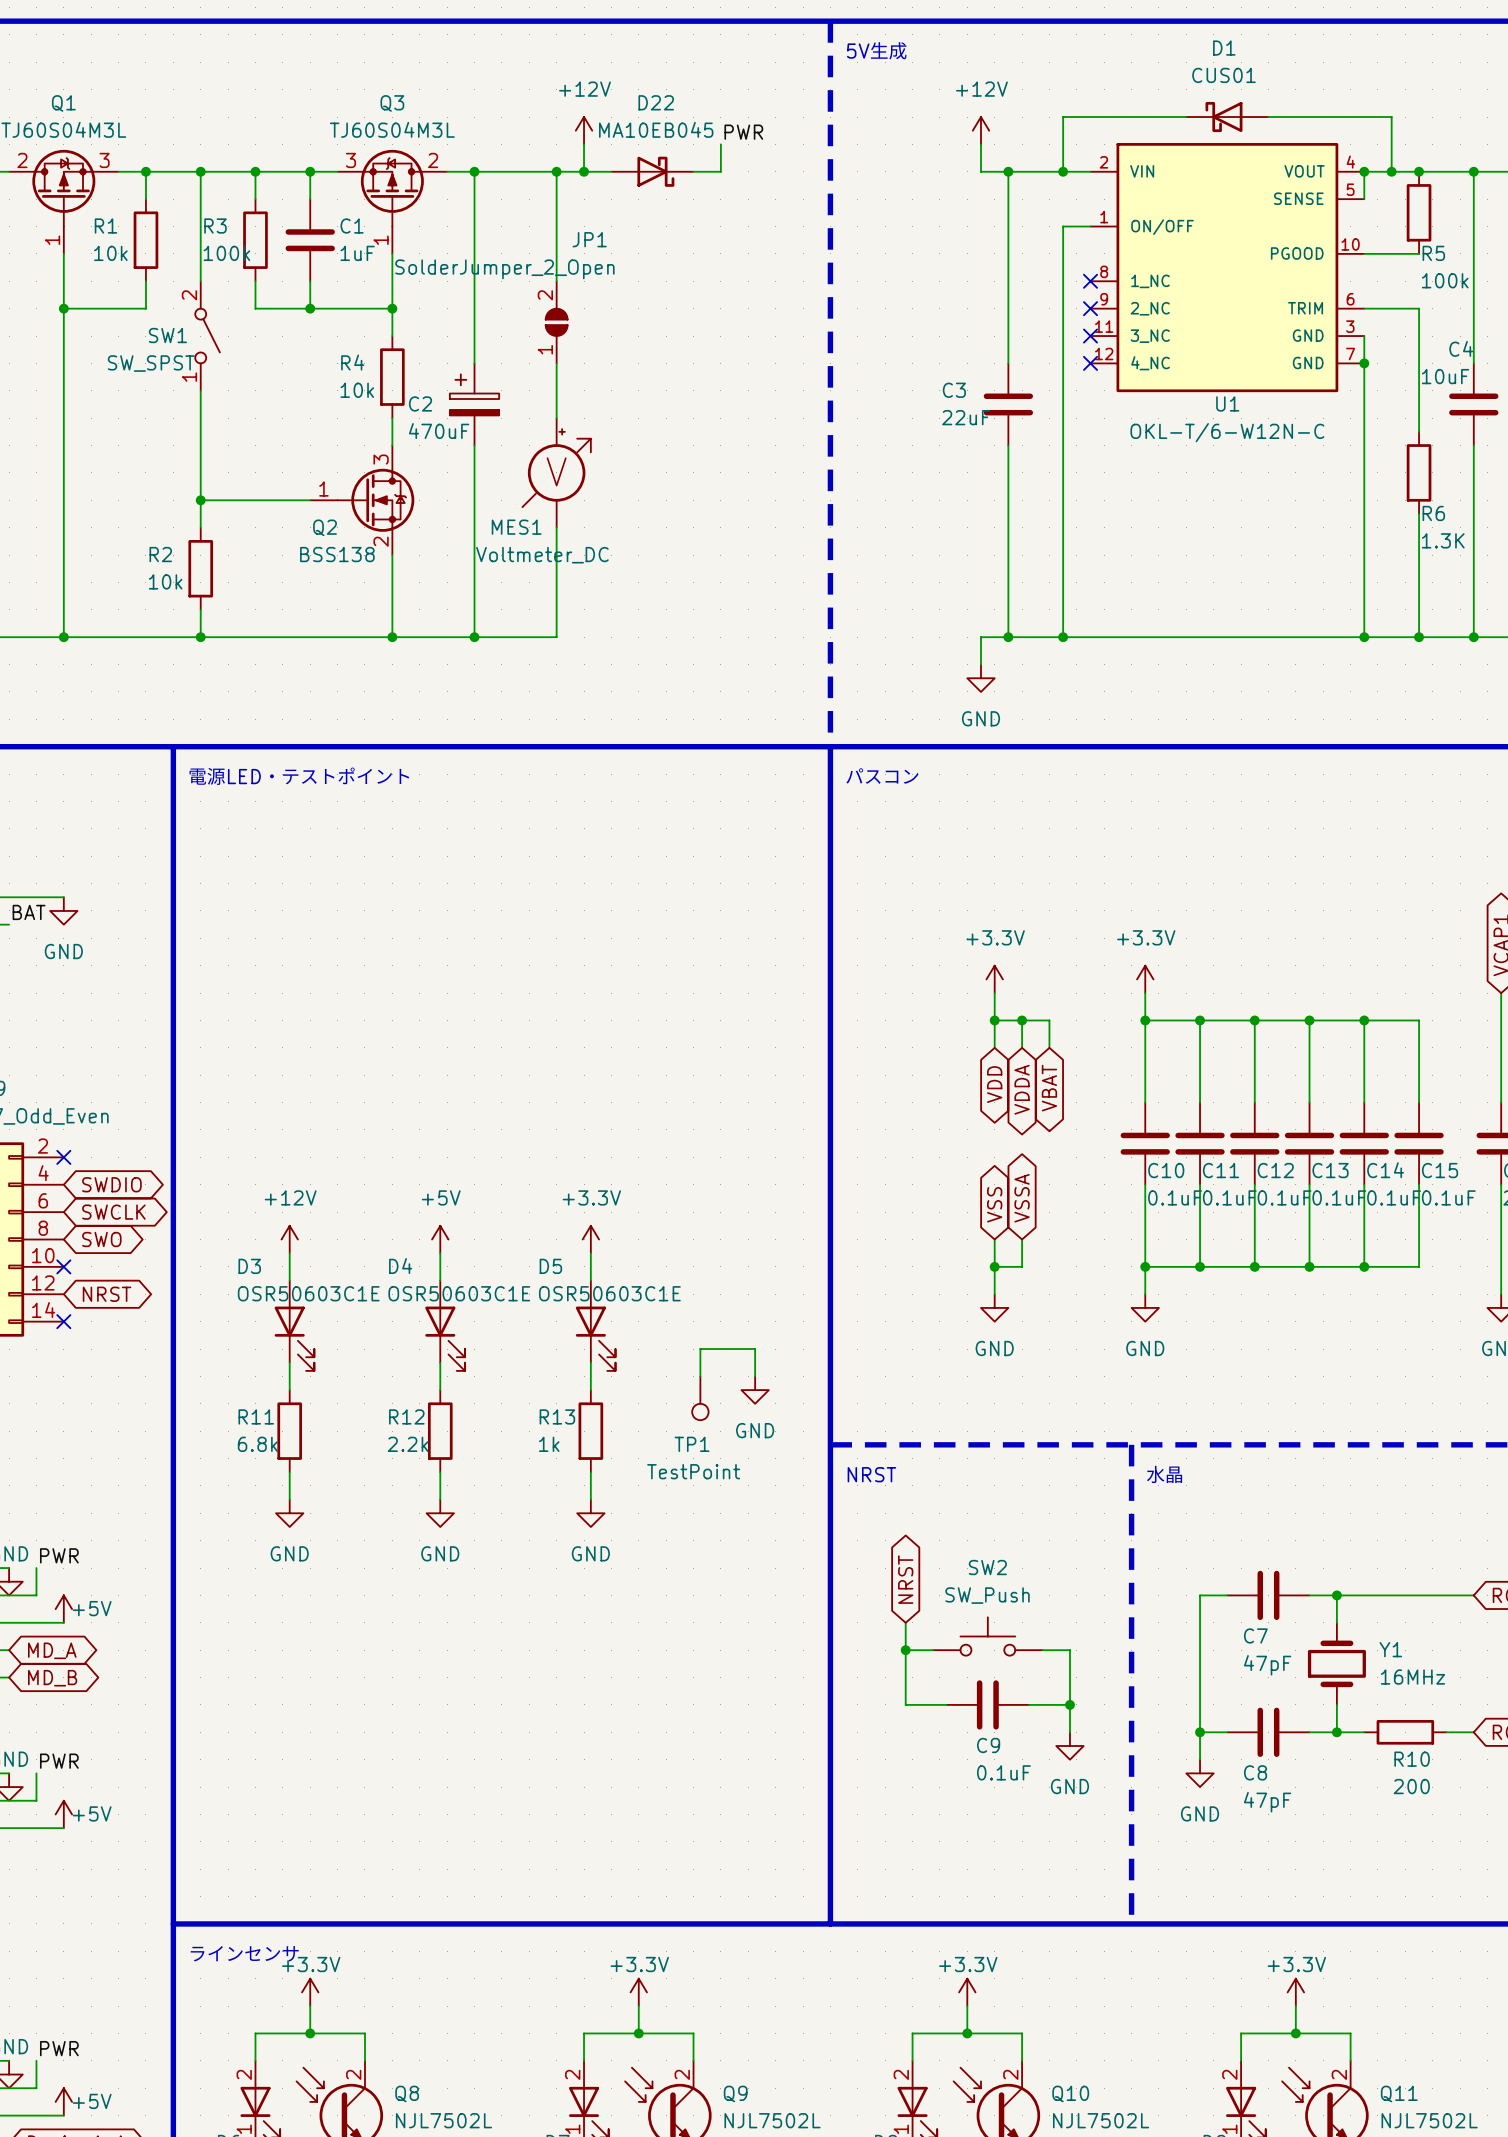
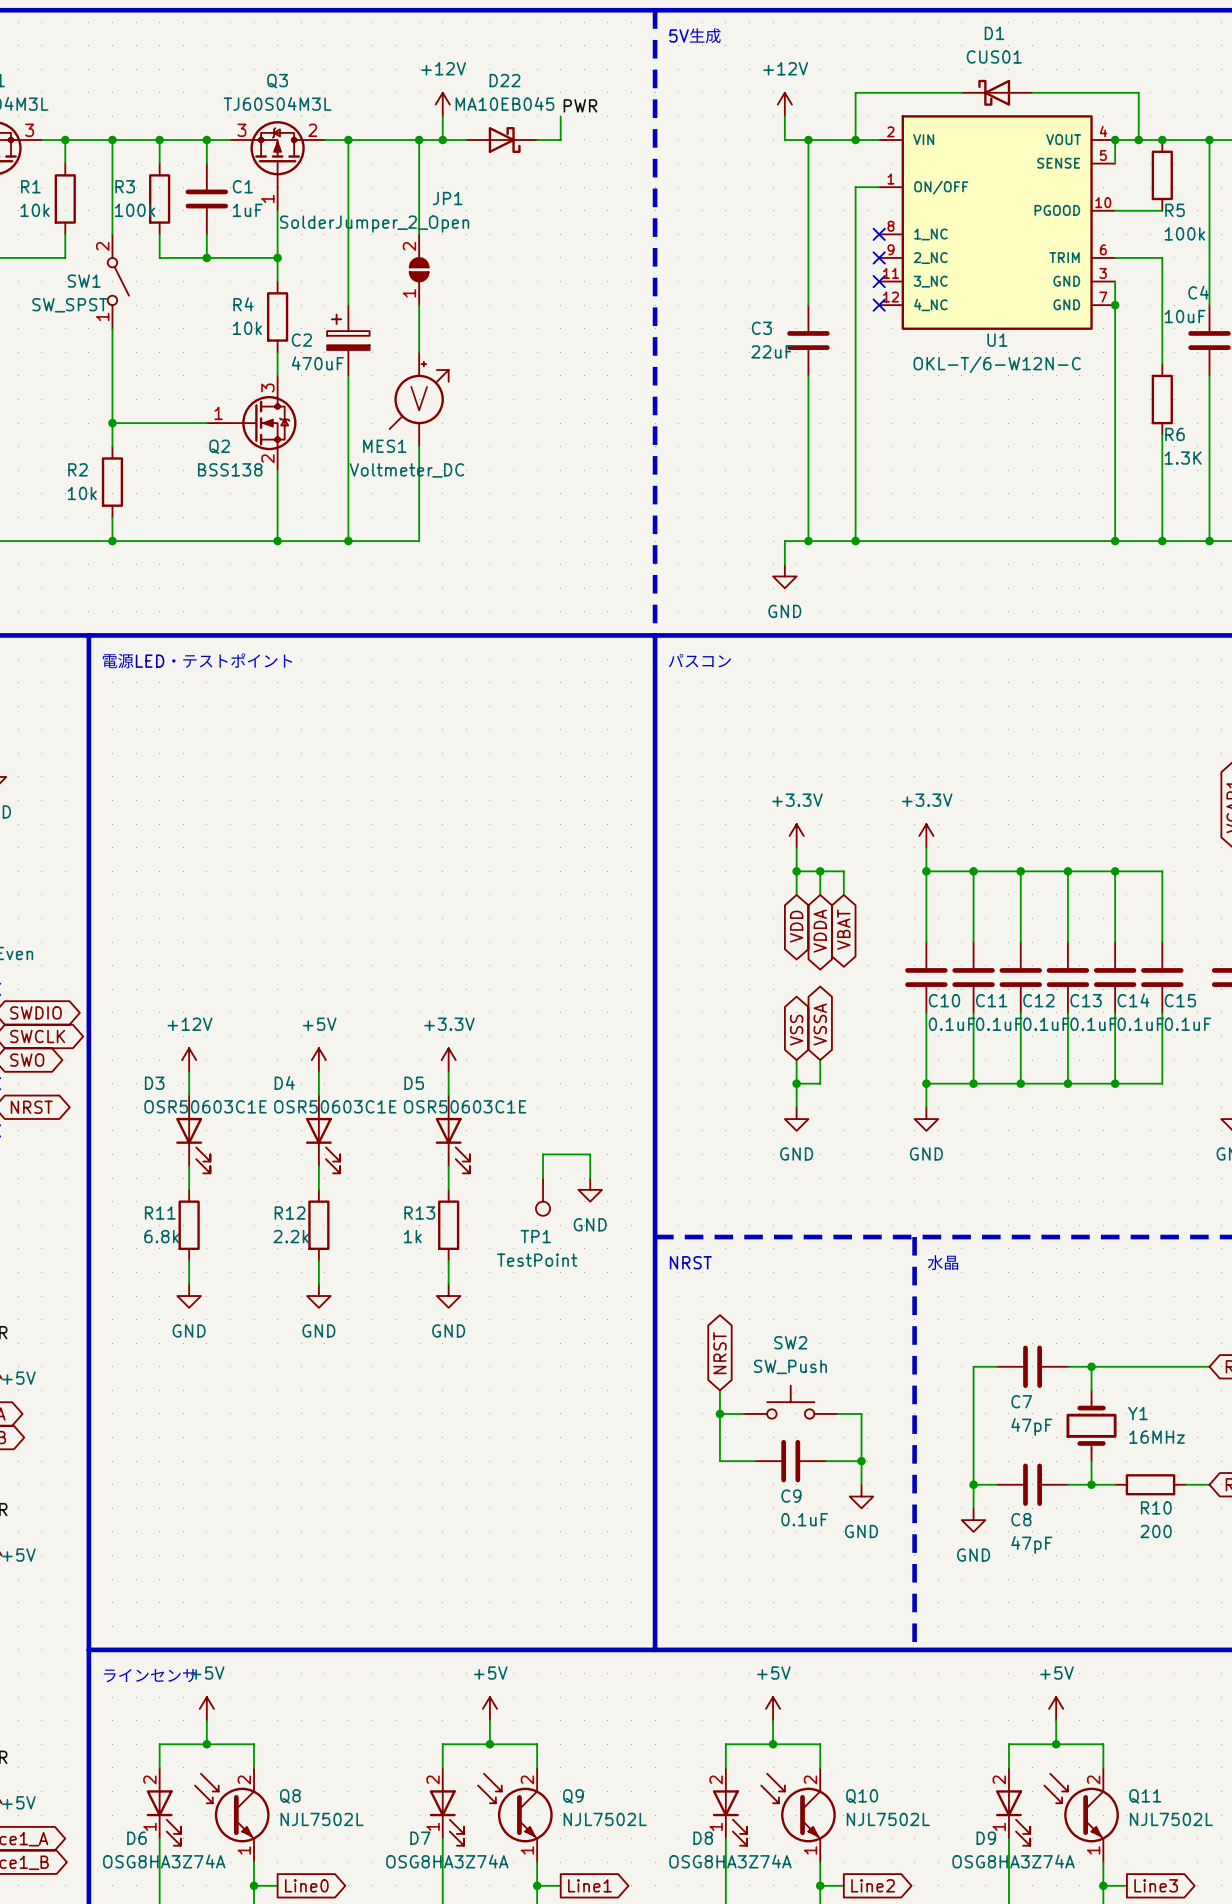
power symbol: +3.3V (310, 1992) -> +5V (206, 1708)
power symbol: +3.3V (638, 1992) -> +5V (489, 1708)
power symbol: +3.3V (967, 1992) -> +5V (773, 1708)
power symbol: +3.3V (1295, 1992) -> +5V (1056, 1708)

